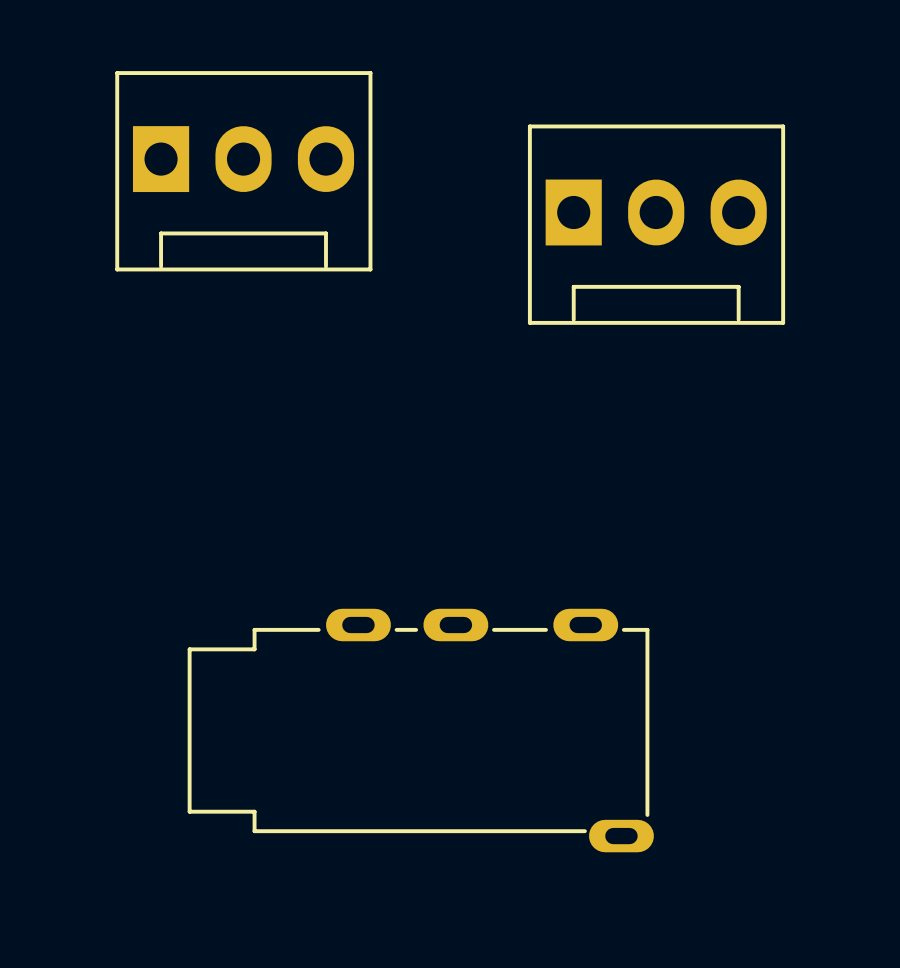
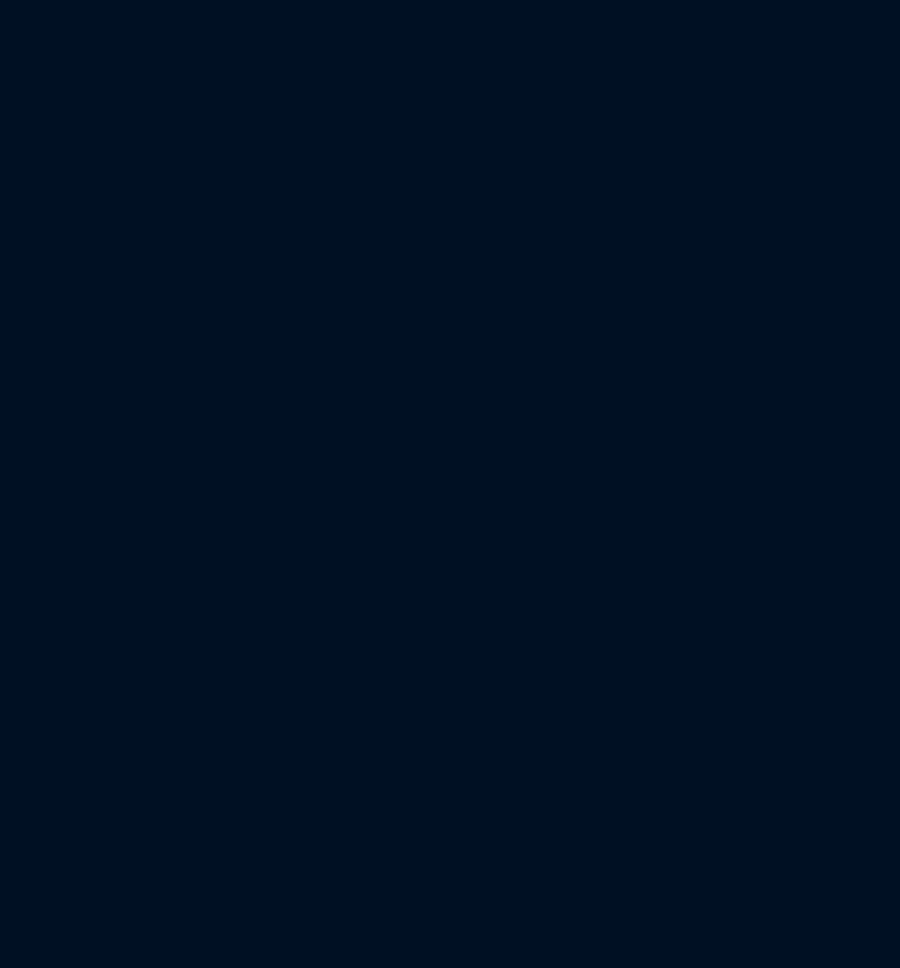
part: (243, 171) -> none
part: (656, 224) -> none
part: (420, 730) -> none

